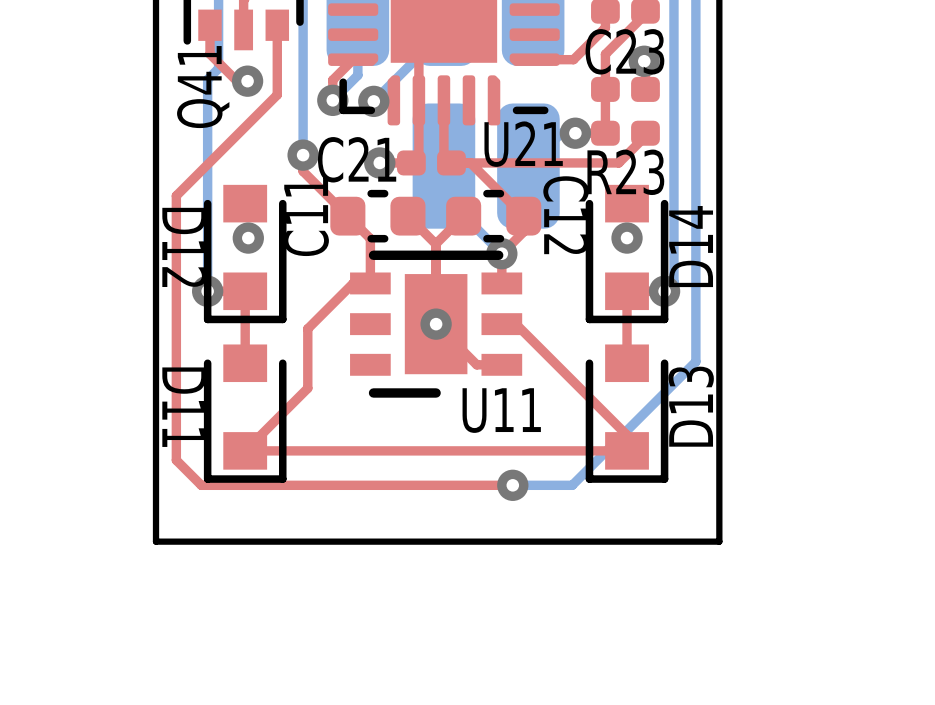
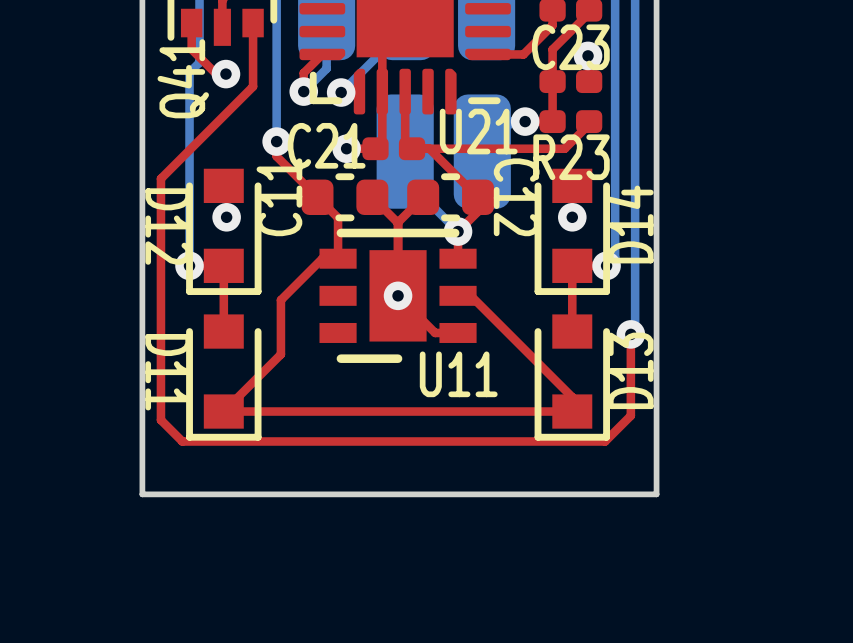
bottom track: (691, 366) (572, 485) (512, 485) -> none
top track: (199, 483) (201, 485) (512, 485) -> (182, 441) (605, 441) (630, 415) (630, 334)
via position: (512, 485) -> (630, 334)

